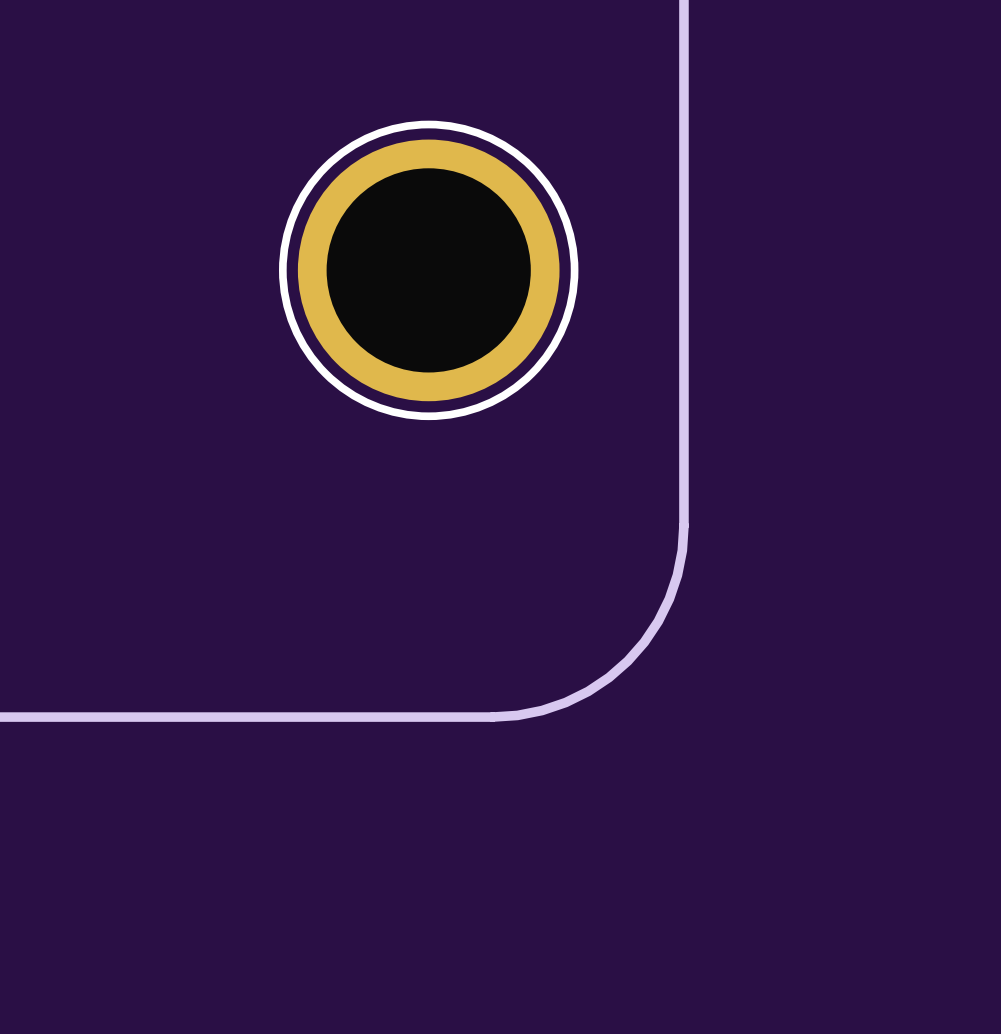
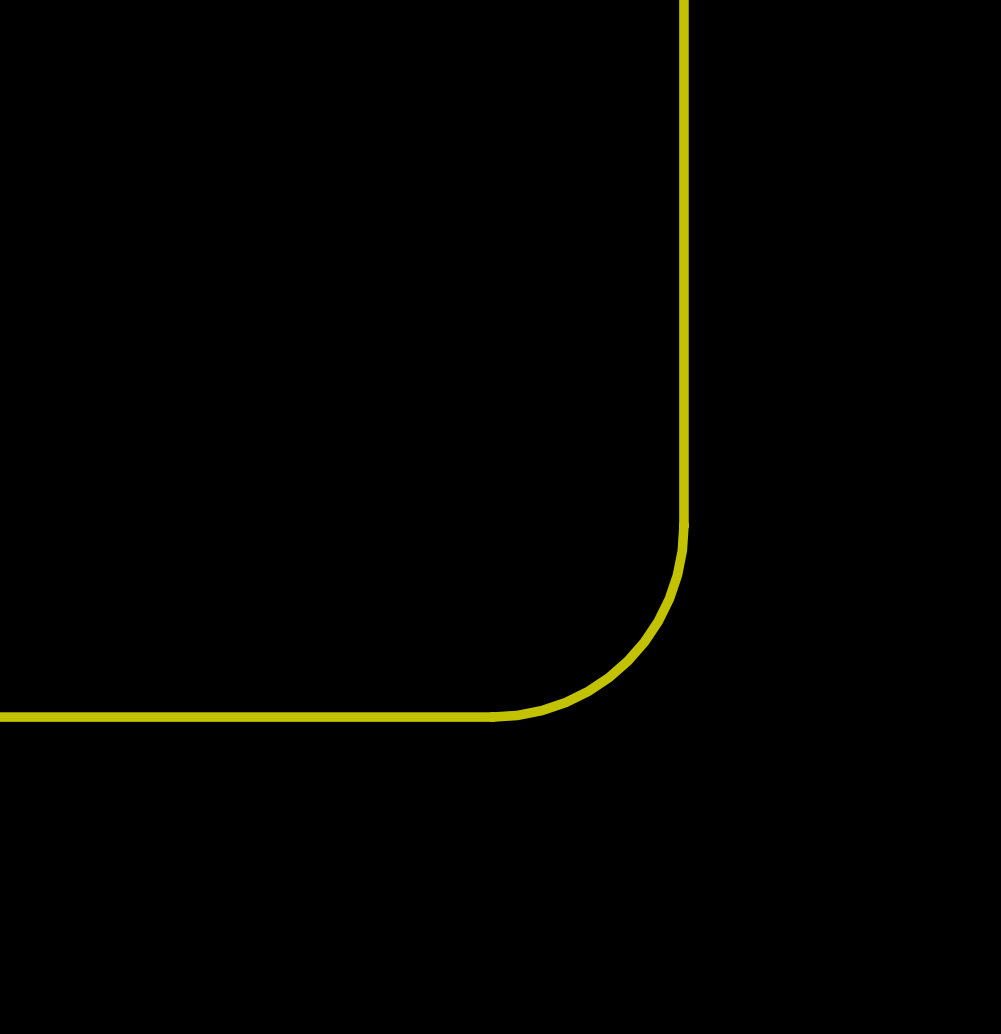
part: (428, 270) -> none

